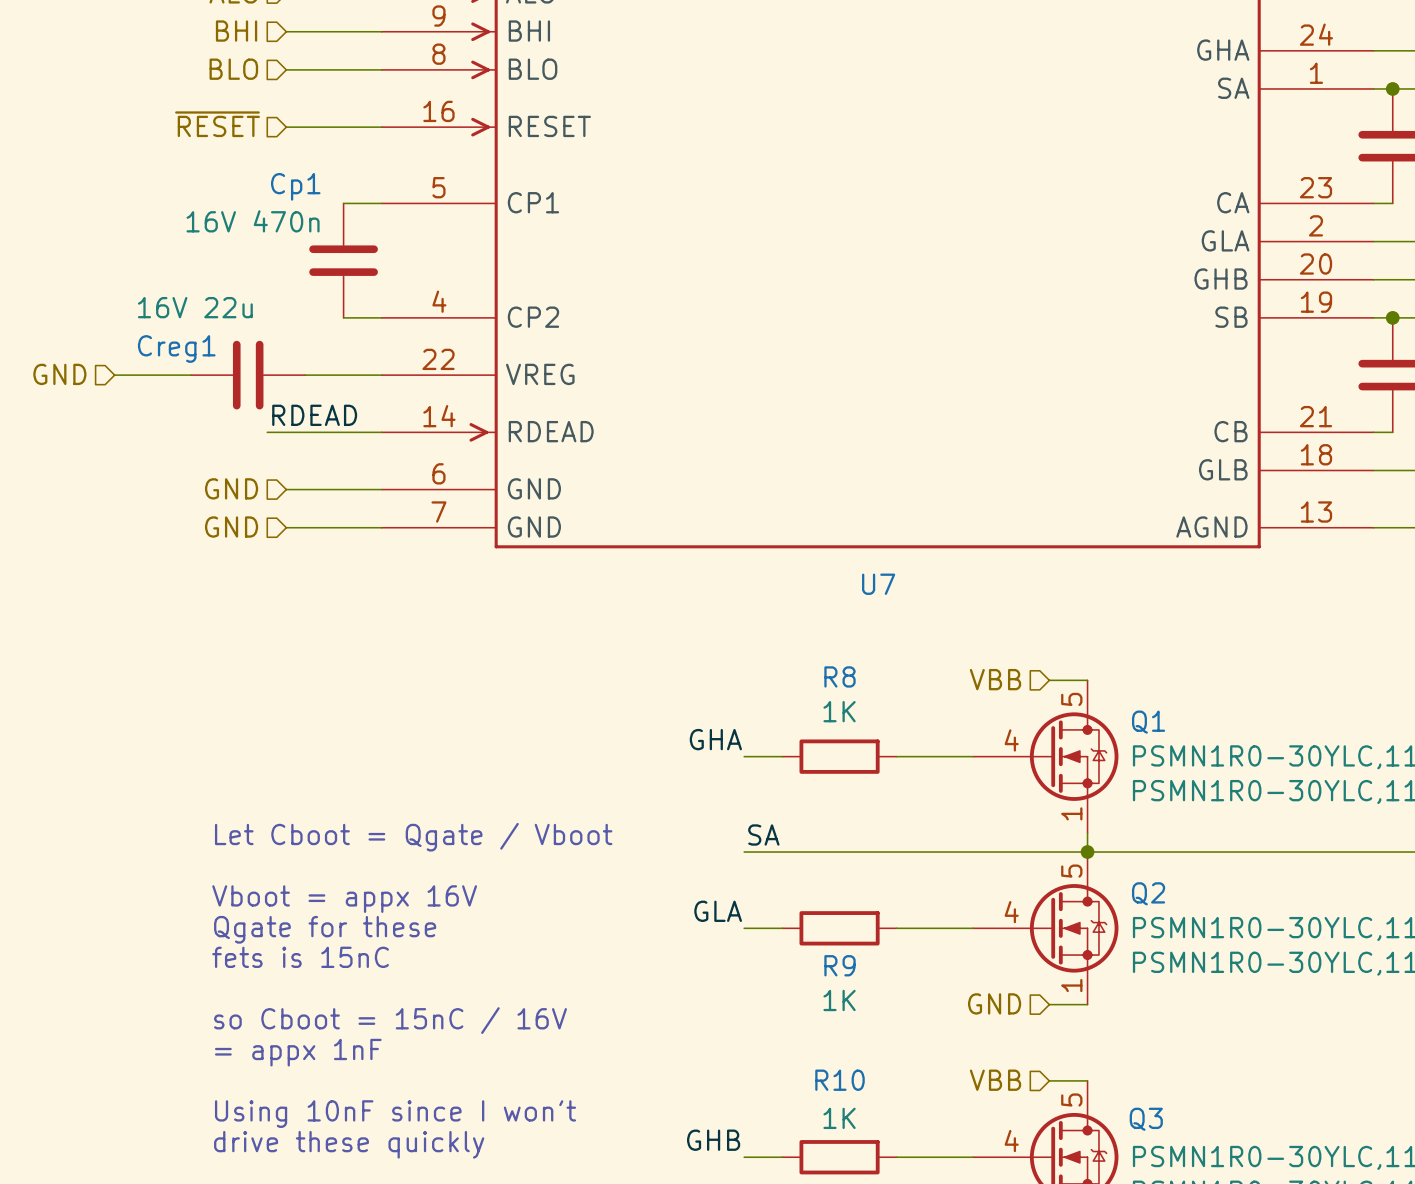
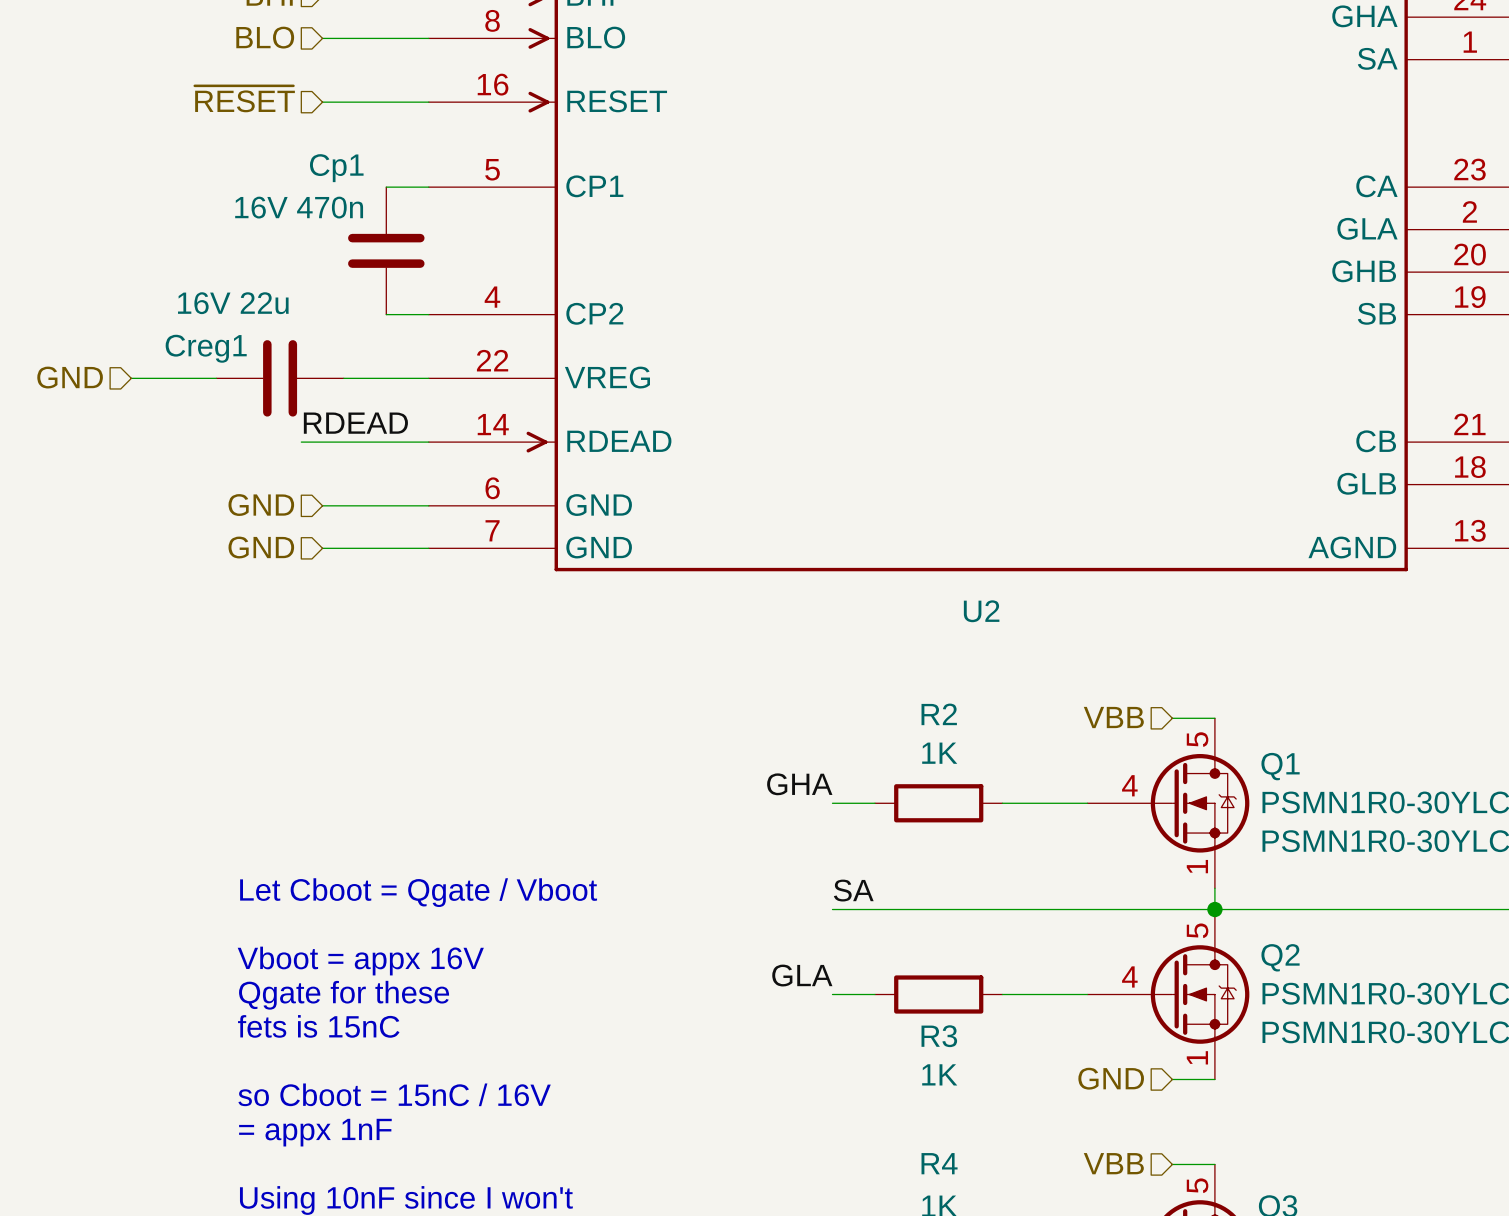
U7 name: U7 (878, 584) -> U2 (981, 611)
R8 name: R8 (840, 676) -> R2 (939, 714)
R9 name: R9 (840, 965) -> R3 (939, 1036)
R10 name: R10 (840, 1080) -> R4 (939, 1163)

